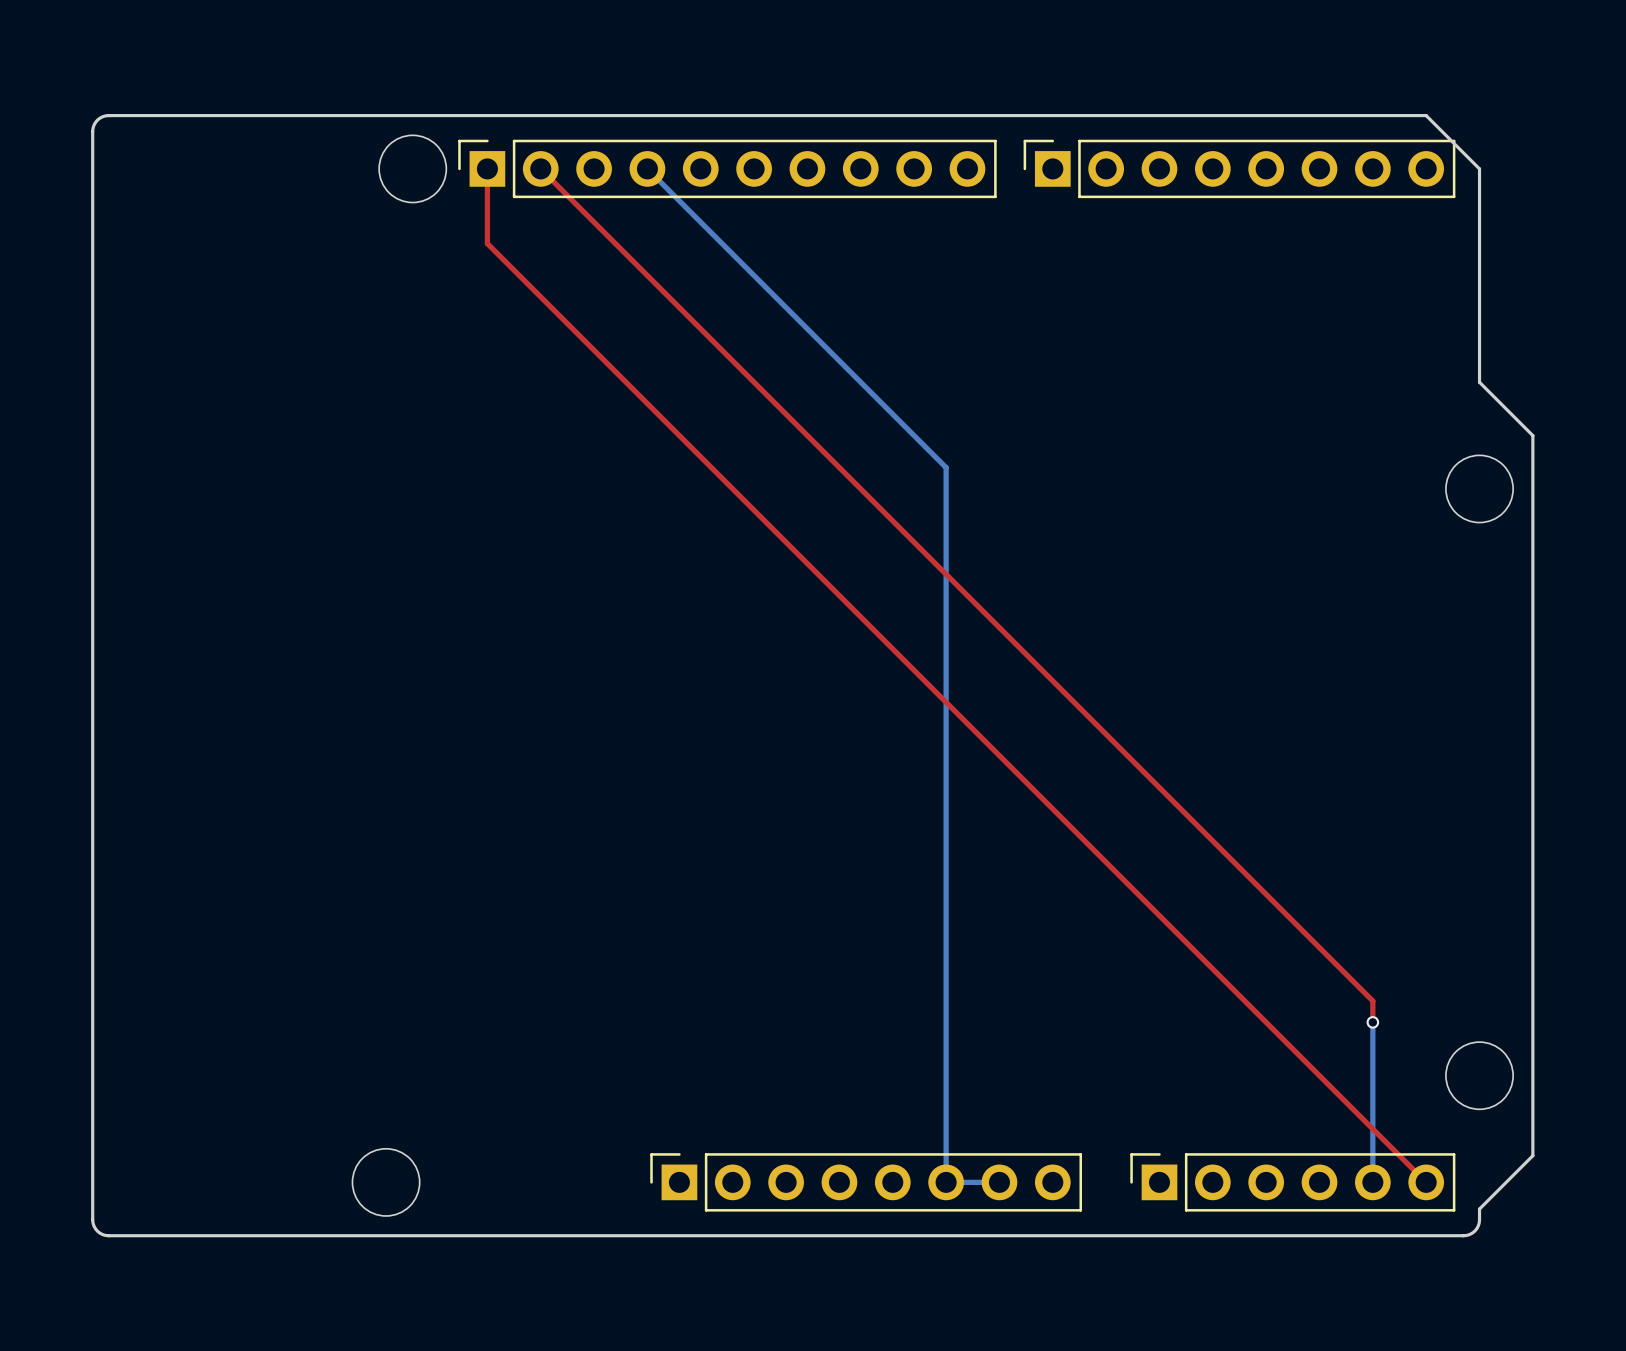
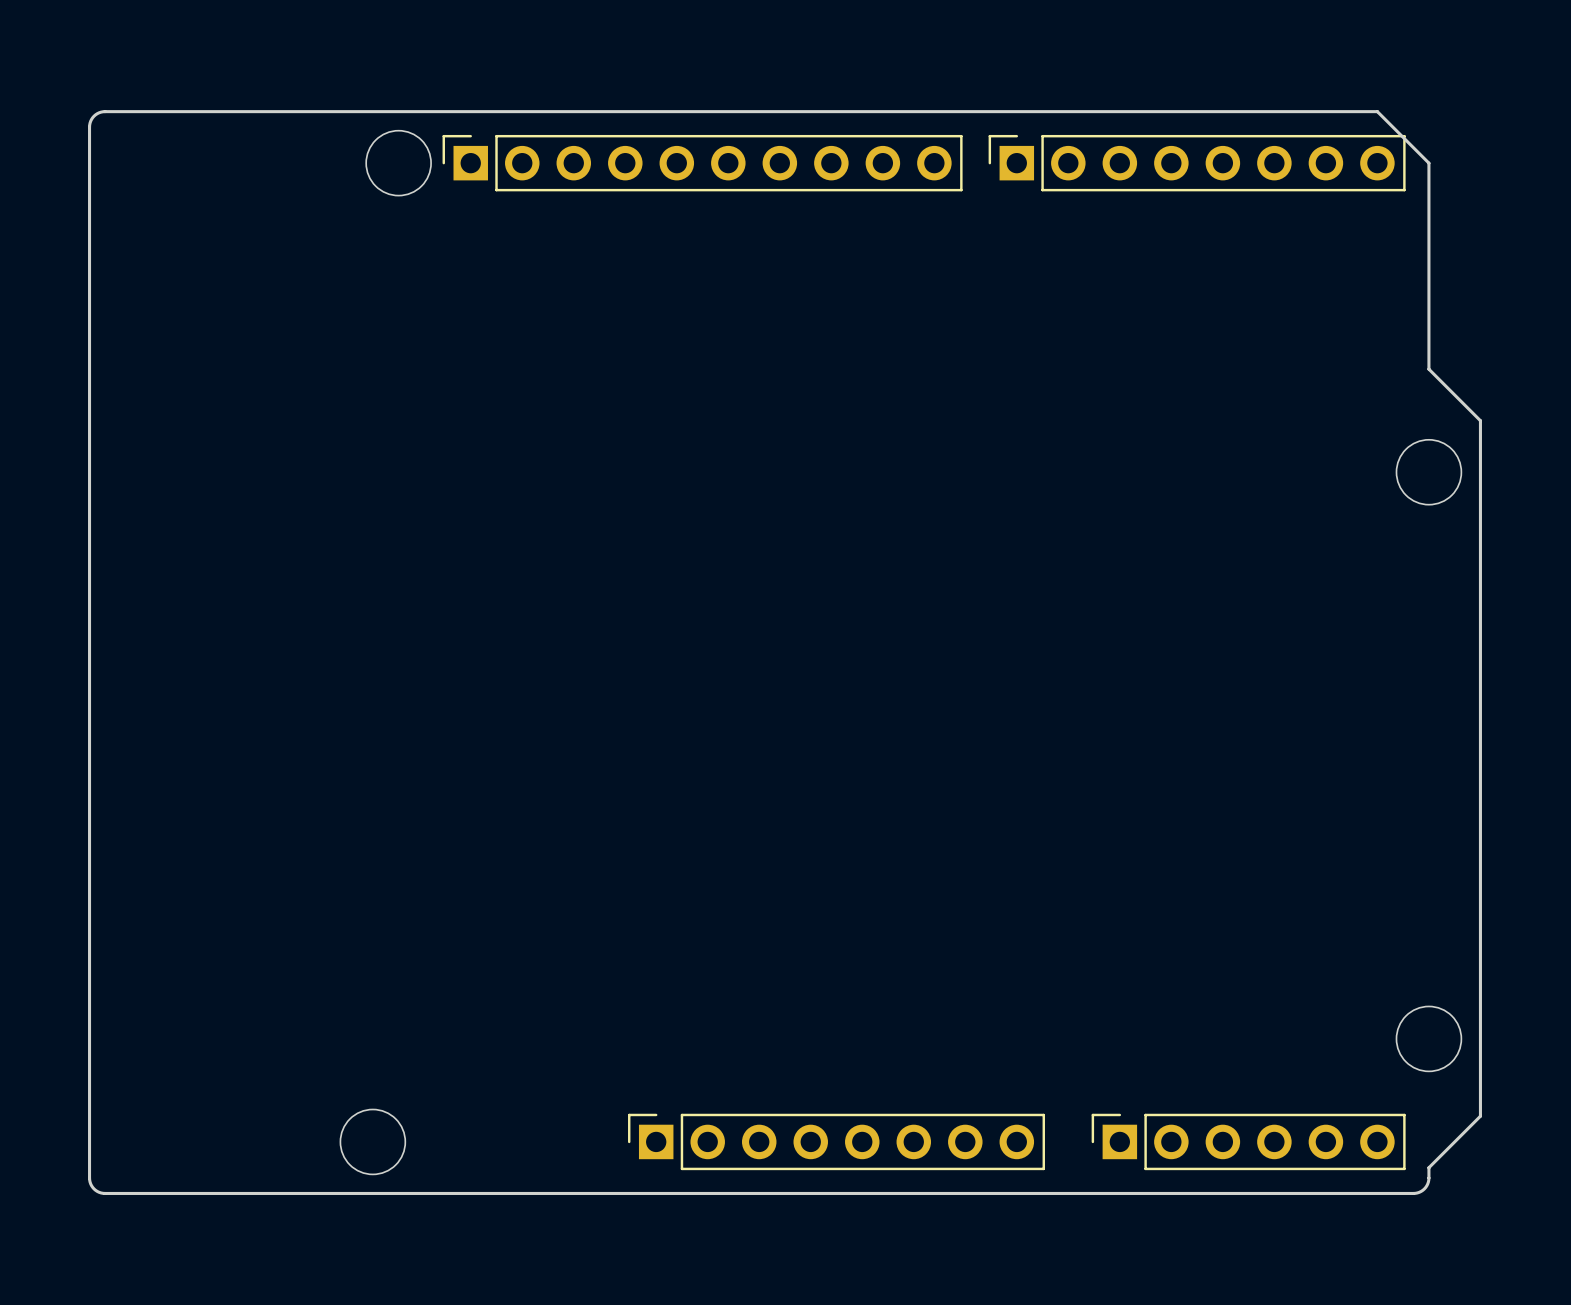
top track: (487, 168) (487, 243) (1426, 1182) -> none
top track: (540, 168) (1372, 1001) (1372, 1022) -> none
bottom track: (647, 168) (946, 467) (946, 1182) (999, 1182) -> none
bottom track: (1372, 1022) (1372, 1182) -> none
via: (1372, 1022) -> none

